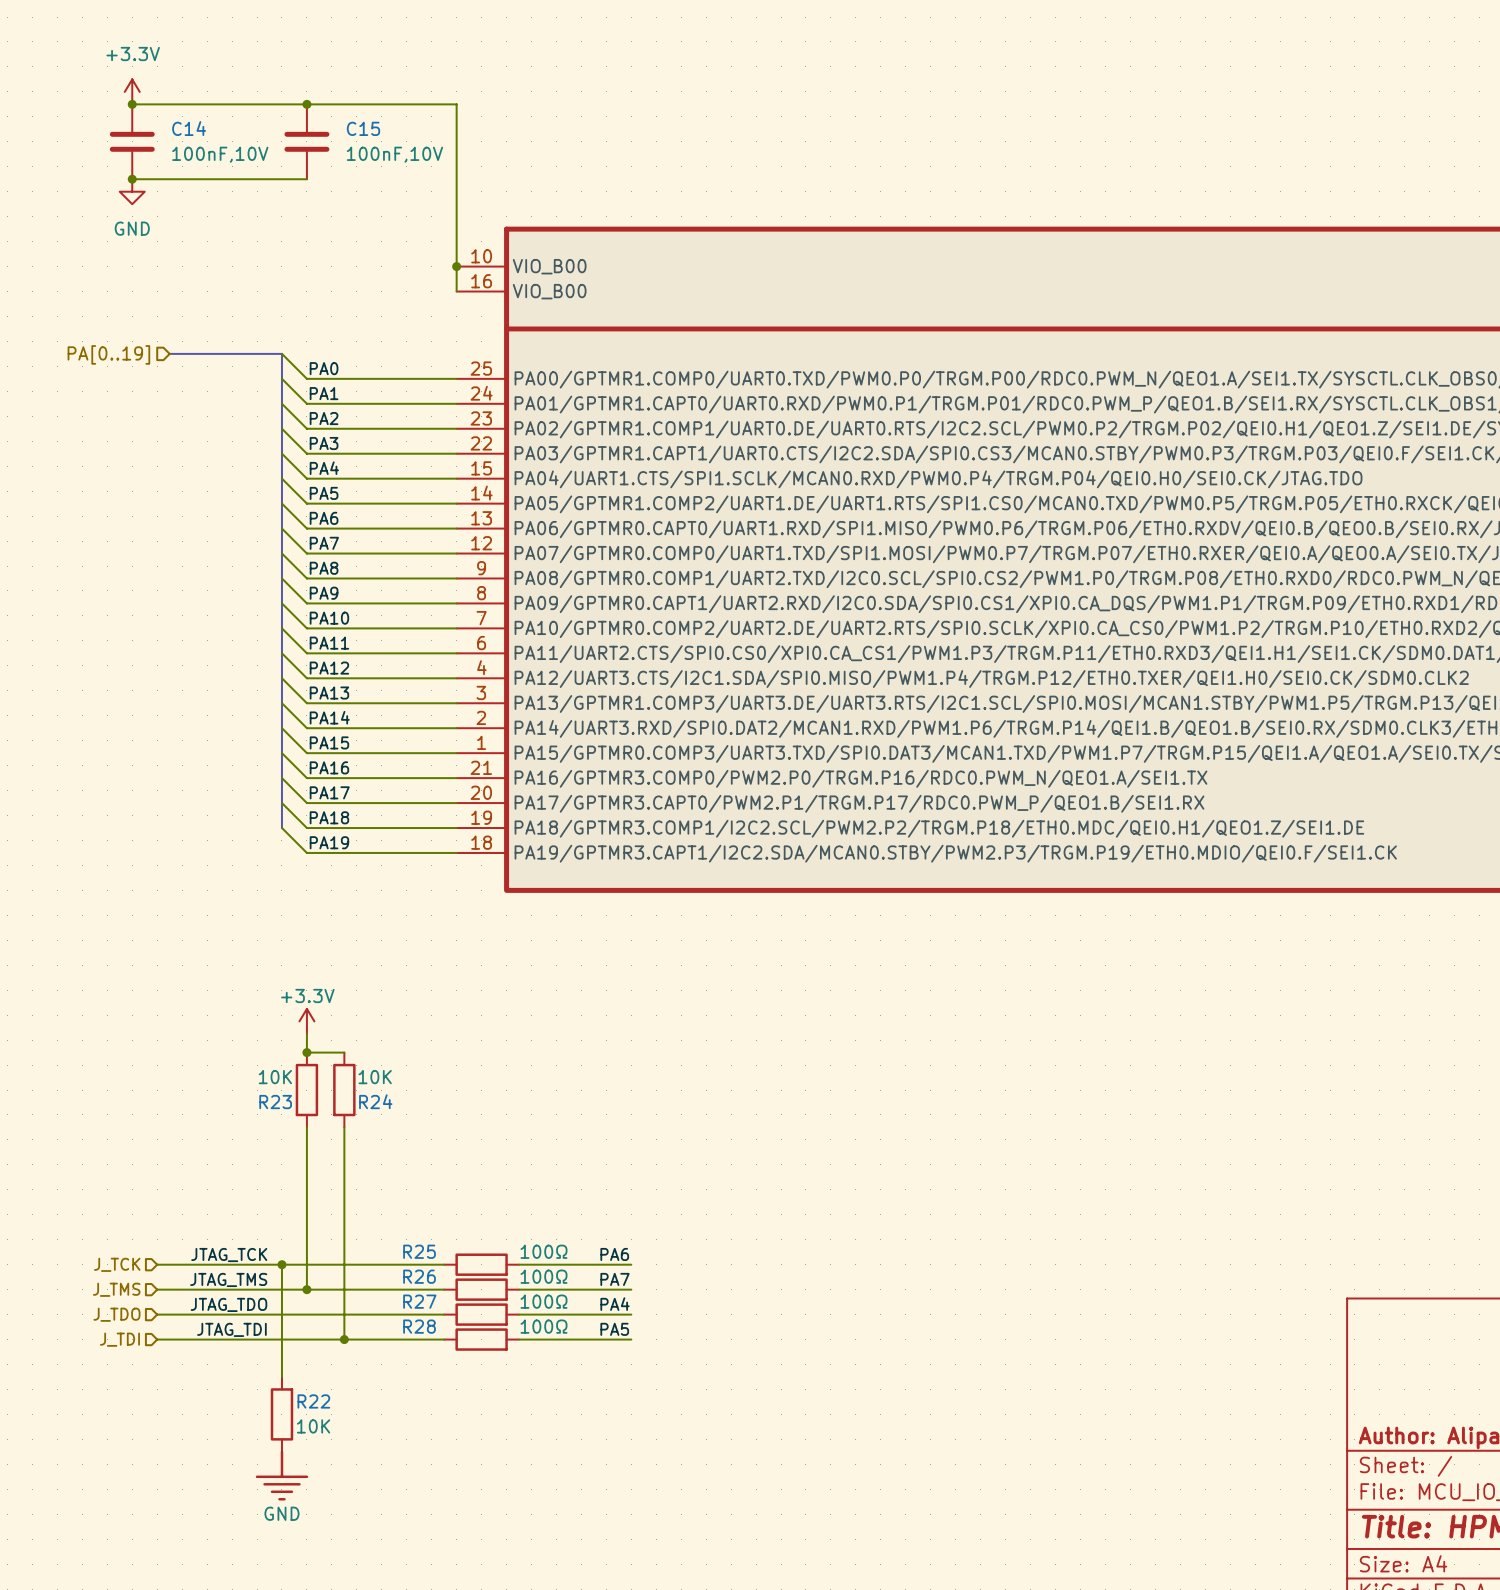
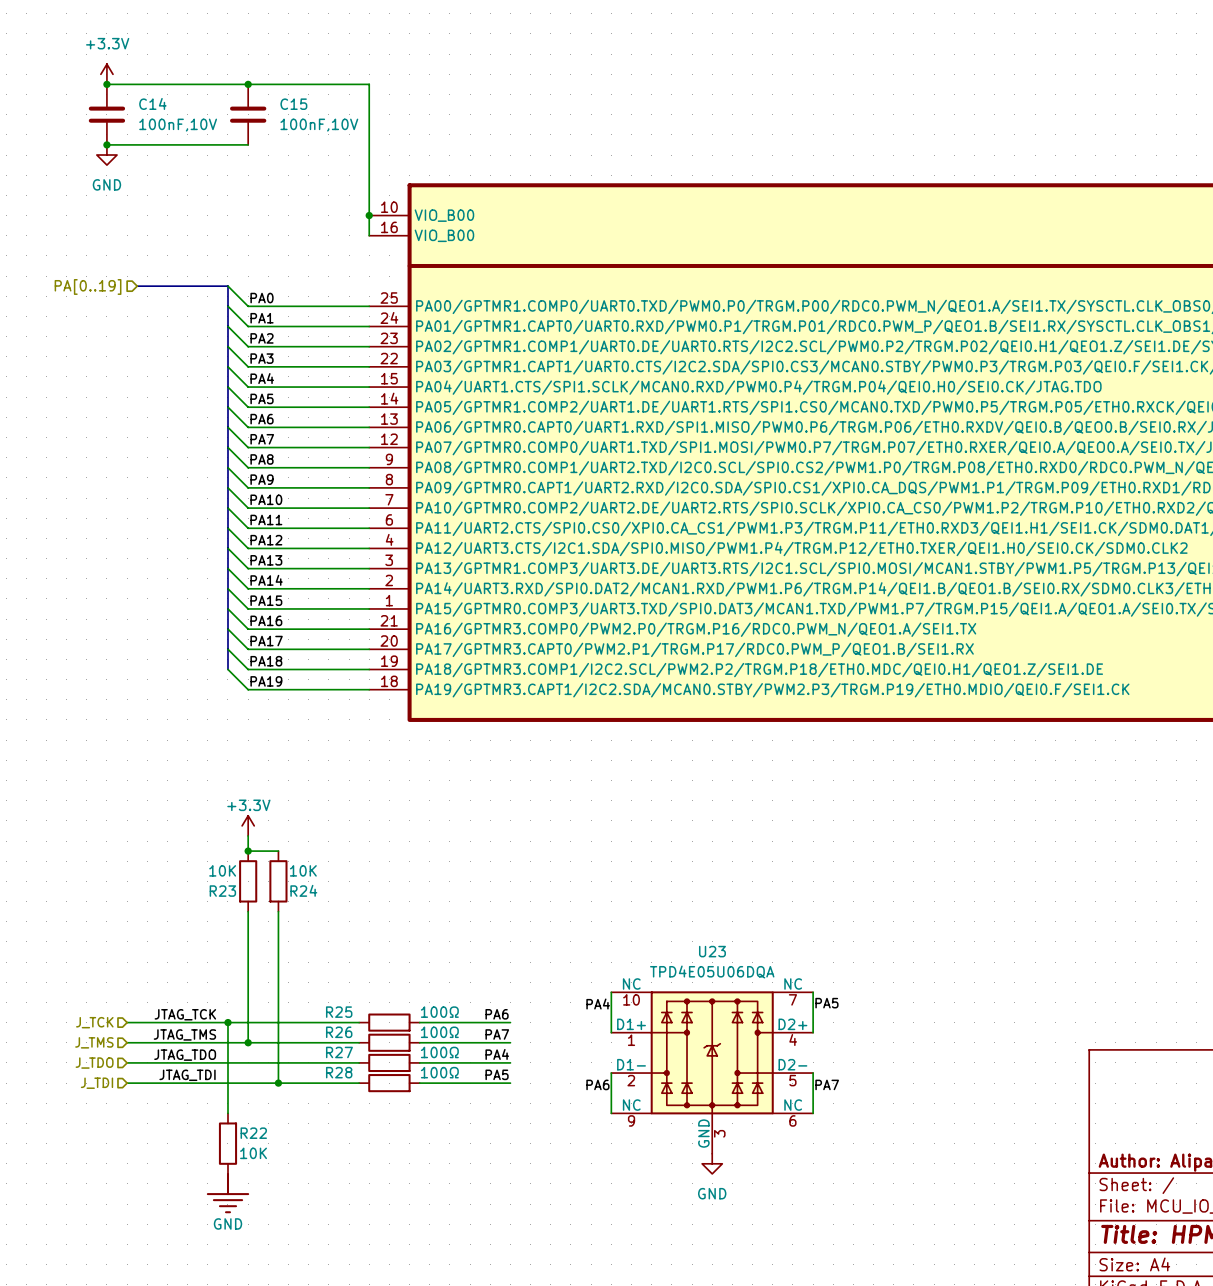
wire: none -> (611, 992) (611, 1032)
wire: none -> (813, 992) (813, 1032)
label: none -> PA5 (826, 1003)
label: none -> PA4 (598, 1004)
U23: none -> TPD4E05U06DQA (712, 1072)
wire: none -> (611, 1073) (611, 1113)
wire: none -> (813, 1073) (813, 1113)
label: none -> PA6 (597, 1084)
label: none -> PA7 (827, 1084)
power symbol: none -> GND (712, 1163)

